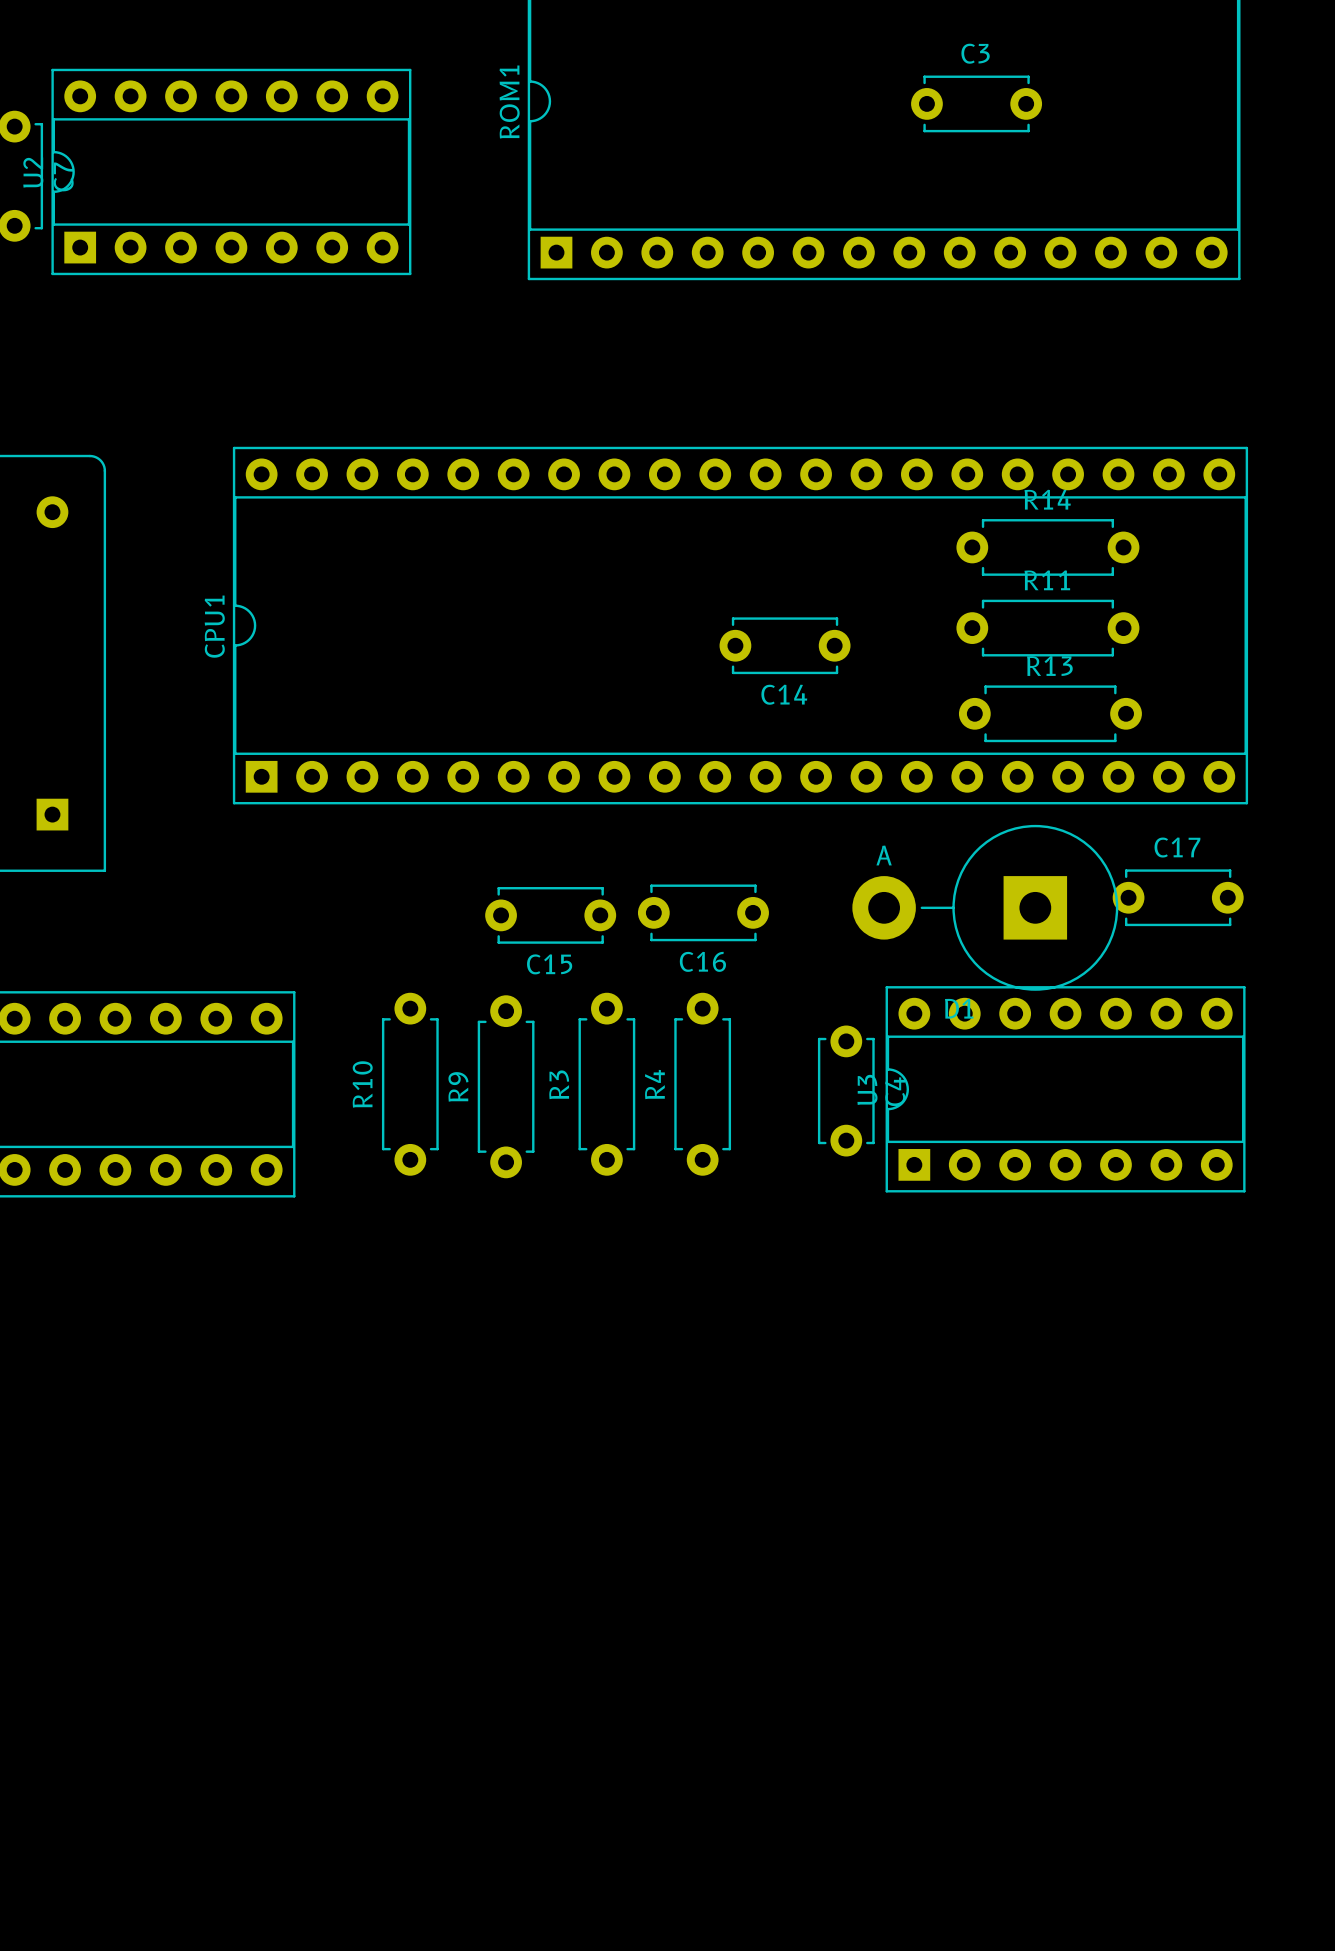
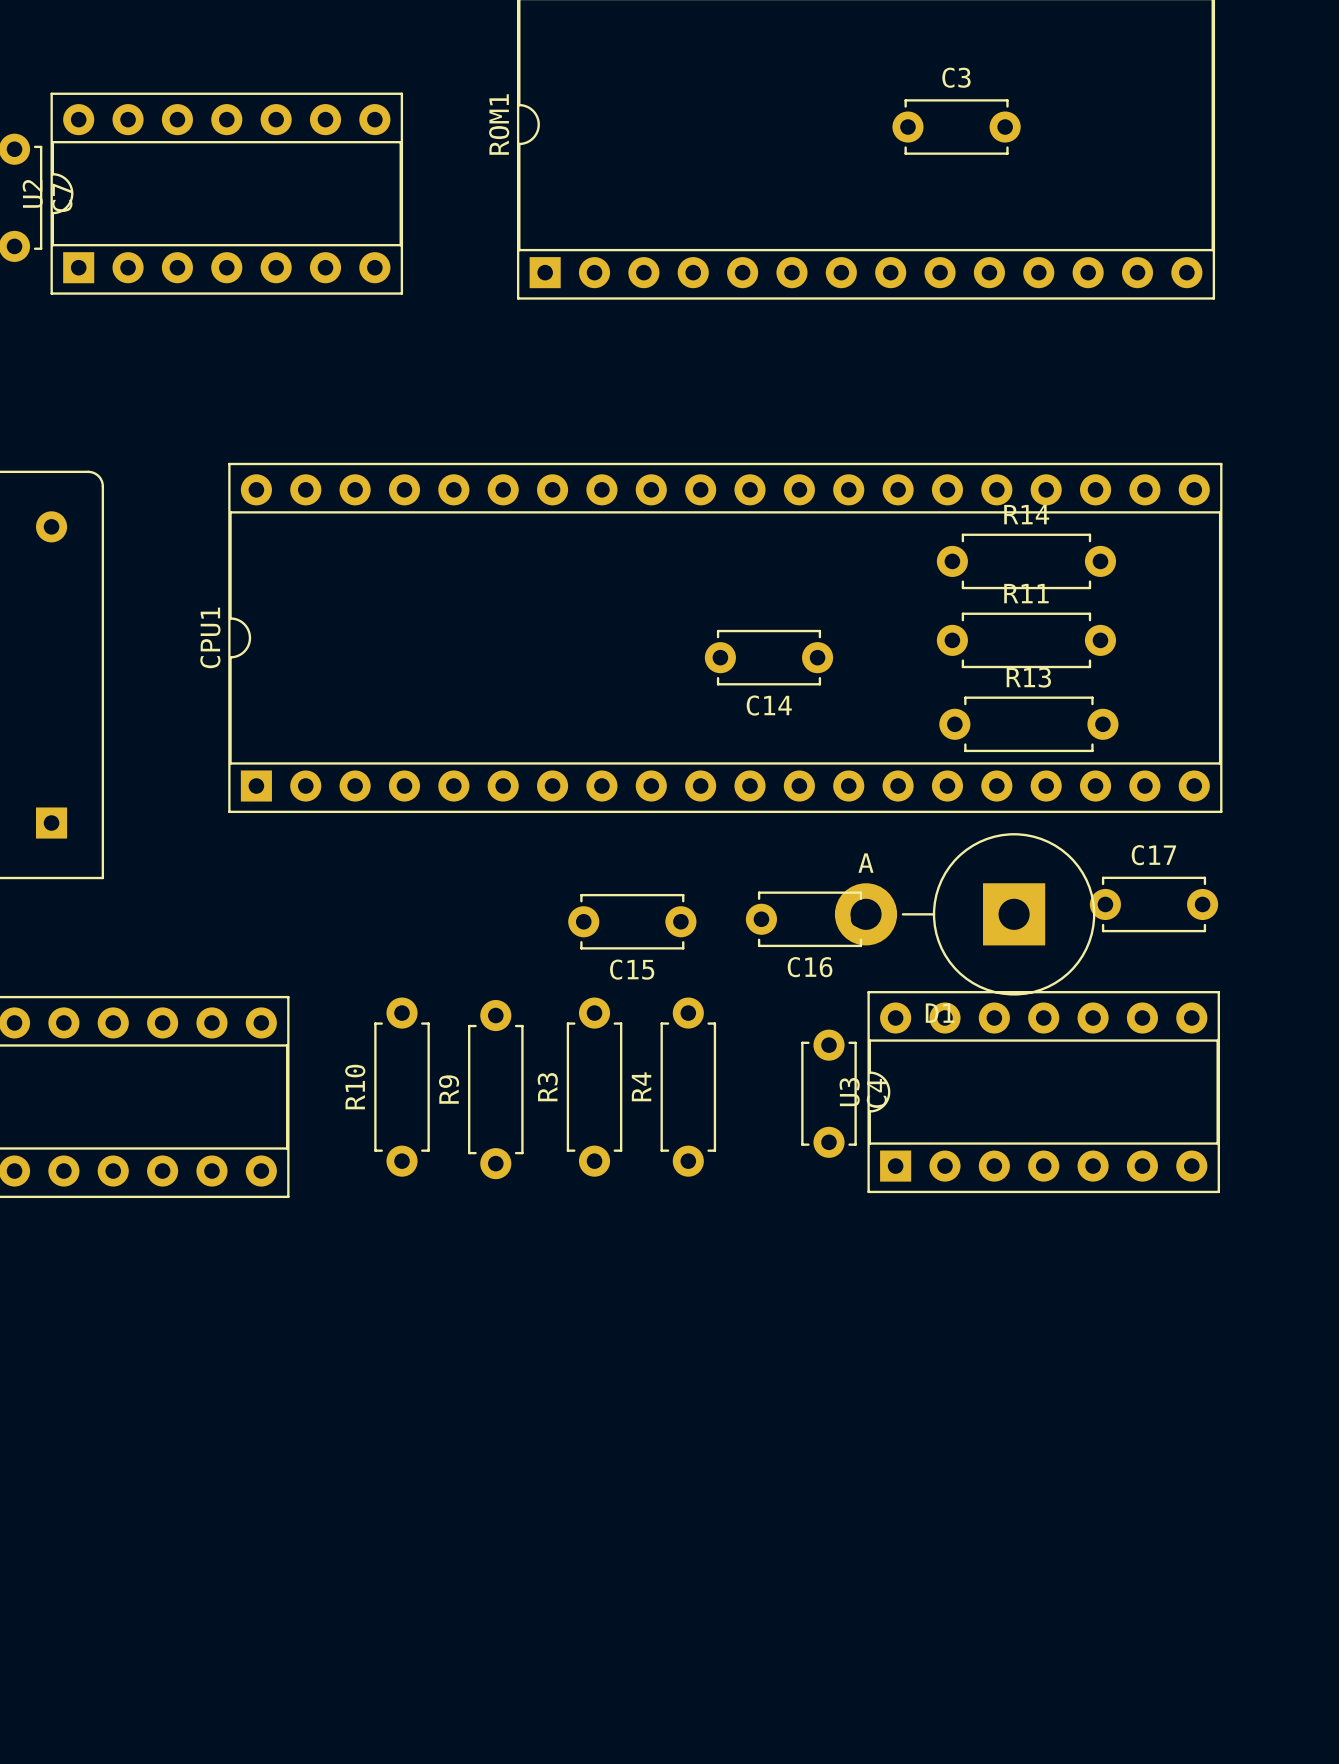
C16 position: (703, 912) -> (810, 919)
C15 position: (550, 915) -> (632, 921)

